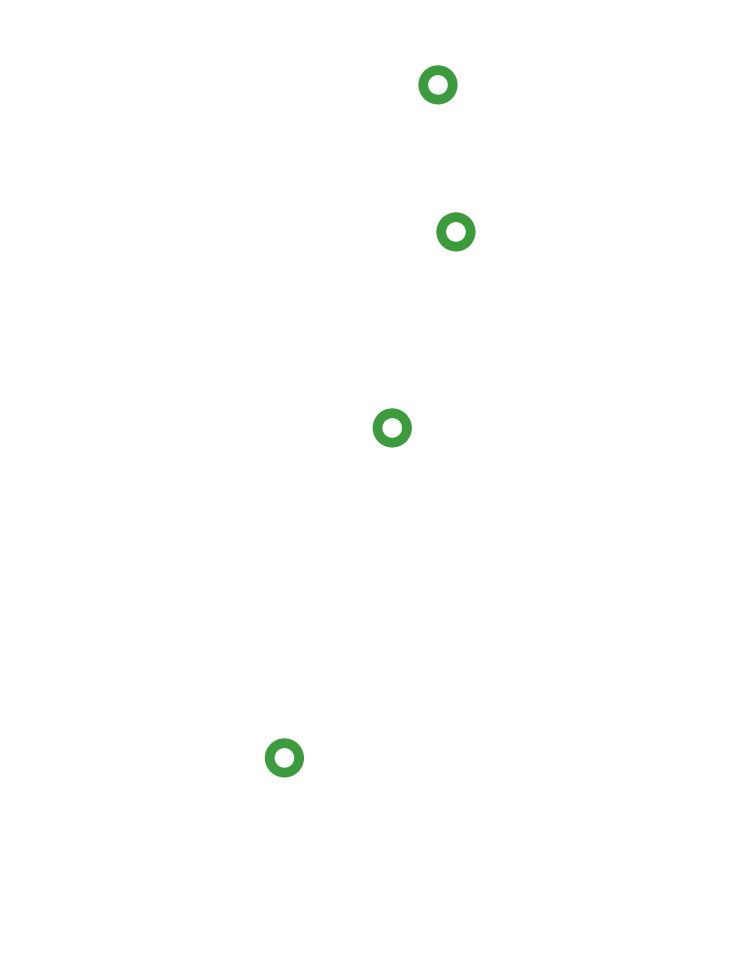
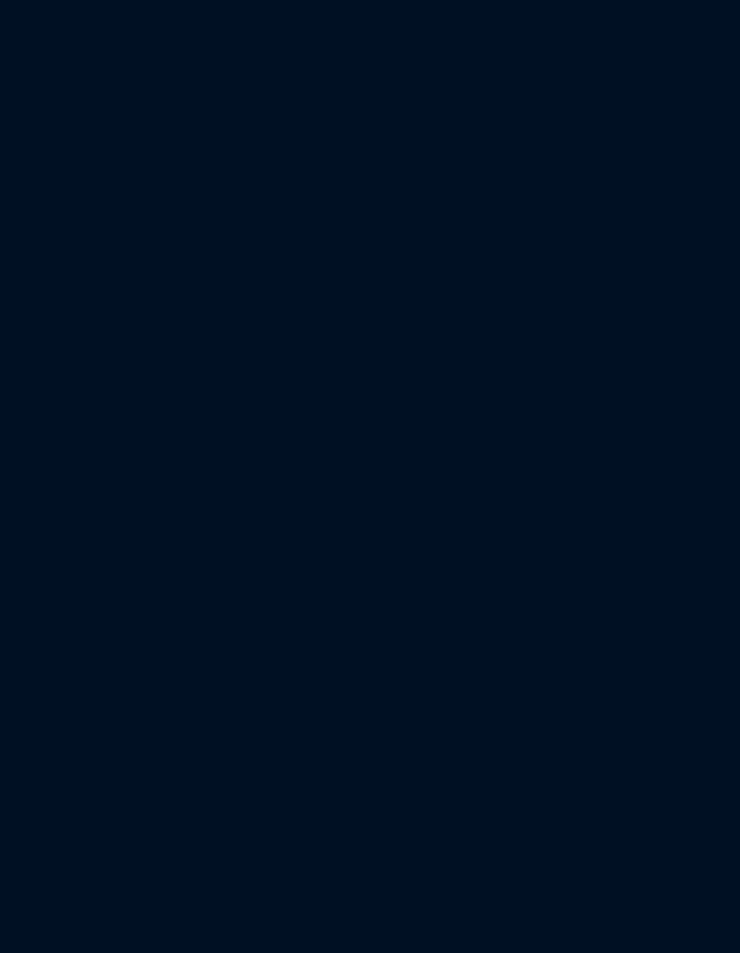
via: (437, 84) -> none
via: (455, 231) -> none
via: (392, 427) -> none
via: (284, 757) -> none

